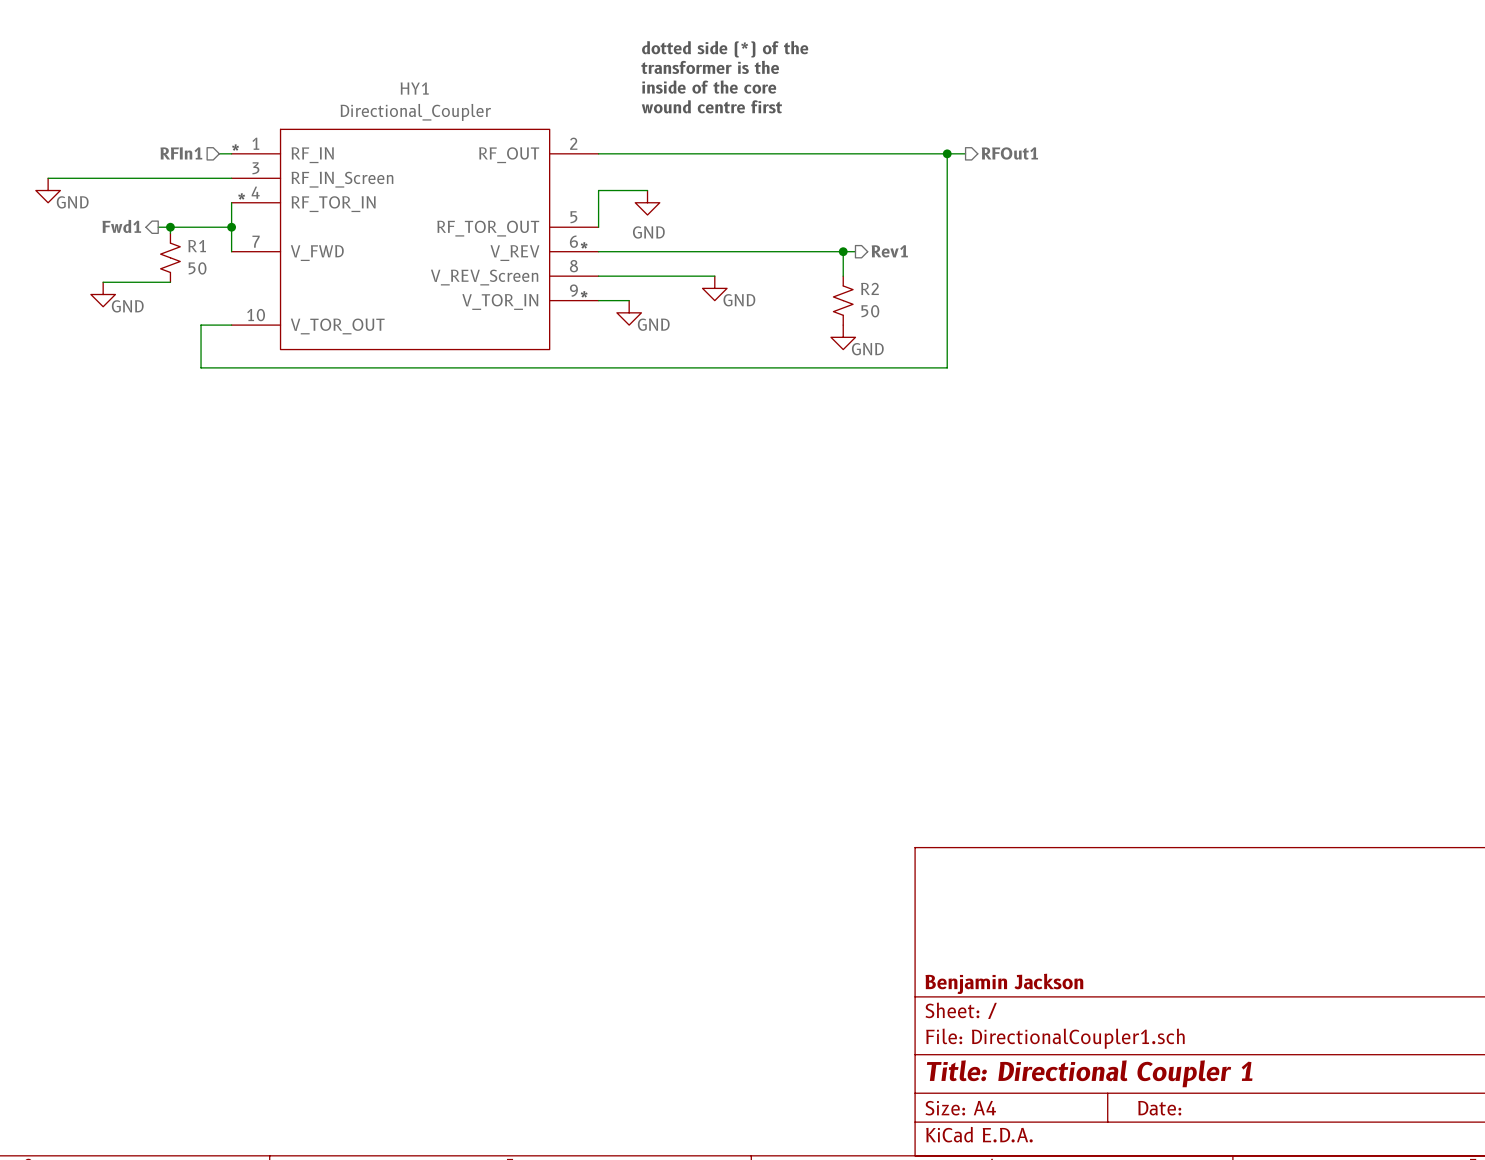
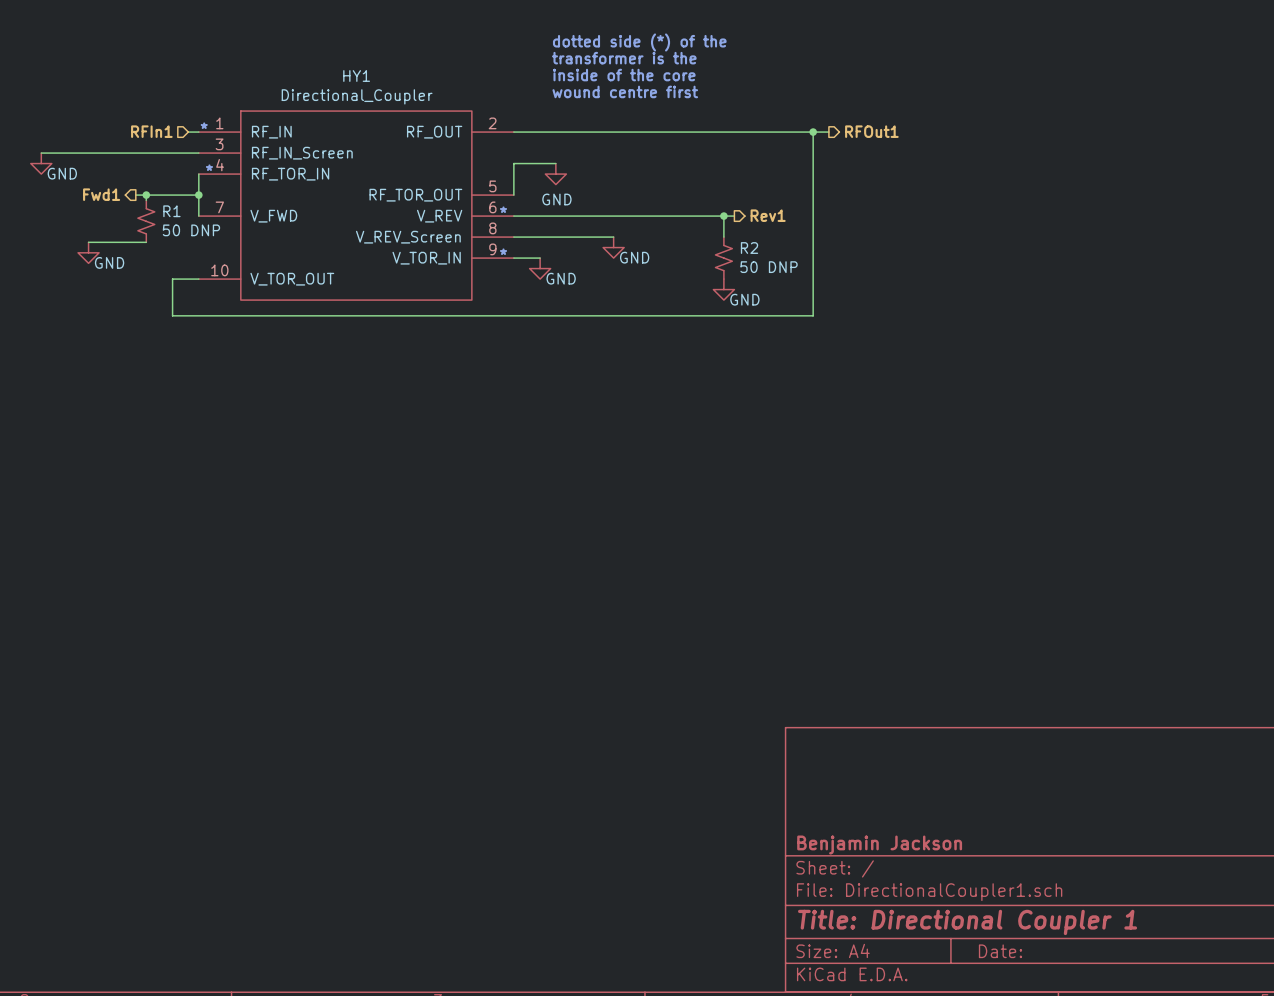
R1 value: 50 (197, 268) -> 50 DNP (191, 230)
R2 value: 50 (870, 311) -> 50 DNP (769, 267)

